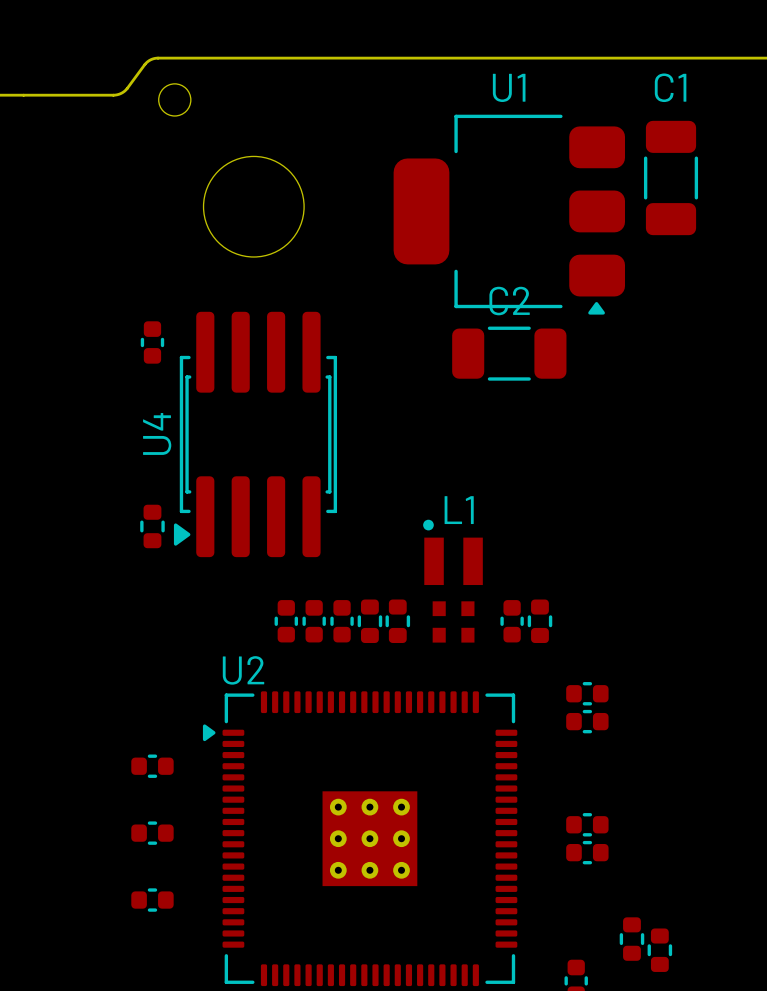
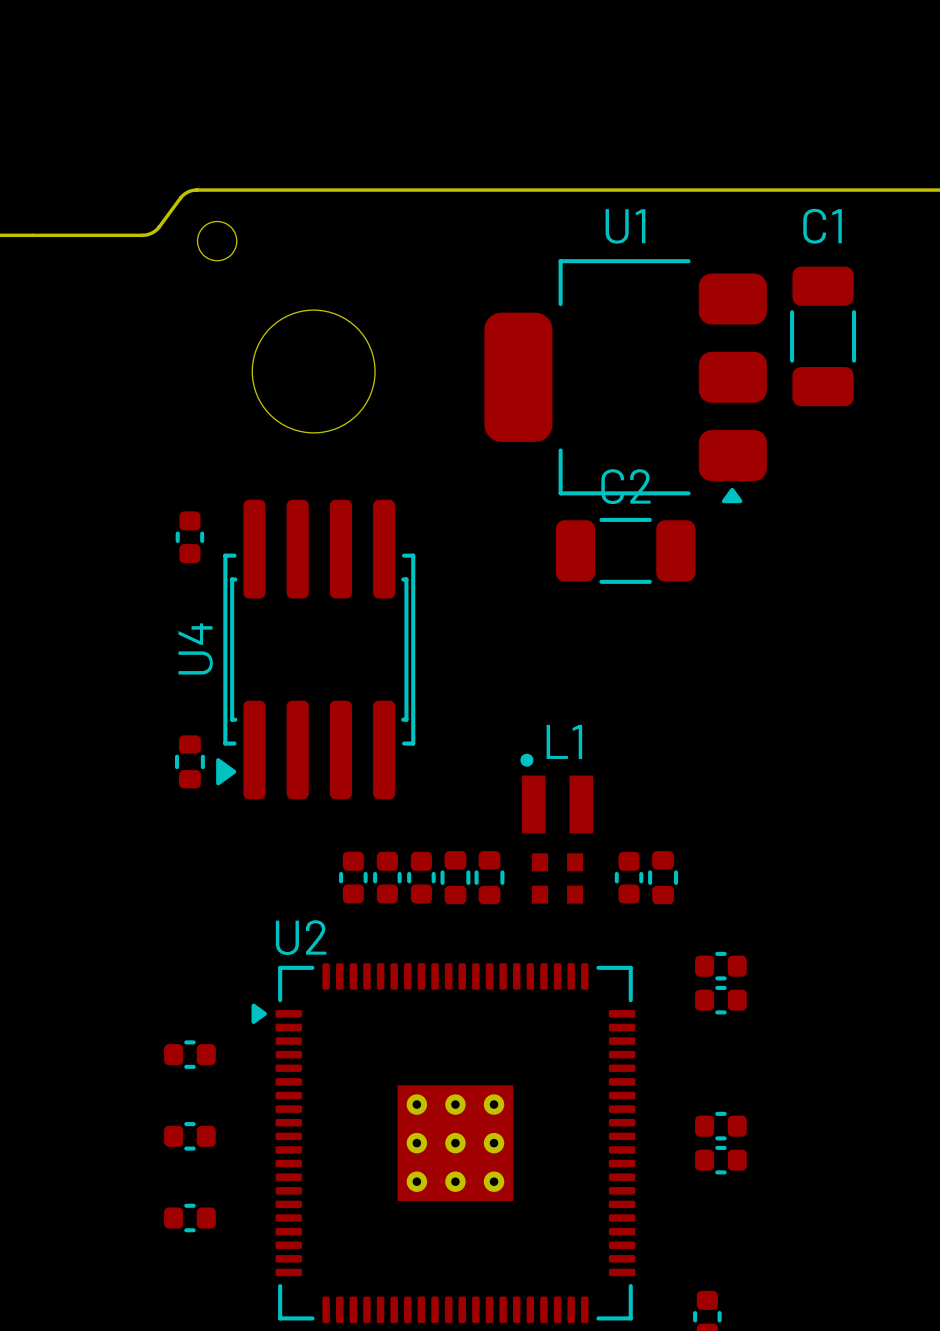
part: (631, 939) -> none
part: (659, 950) -> none

